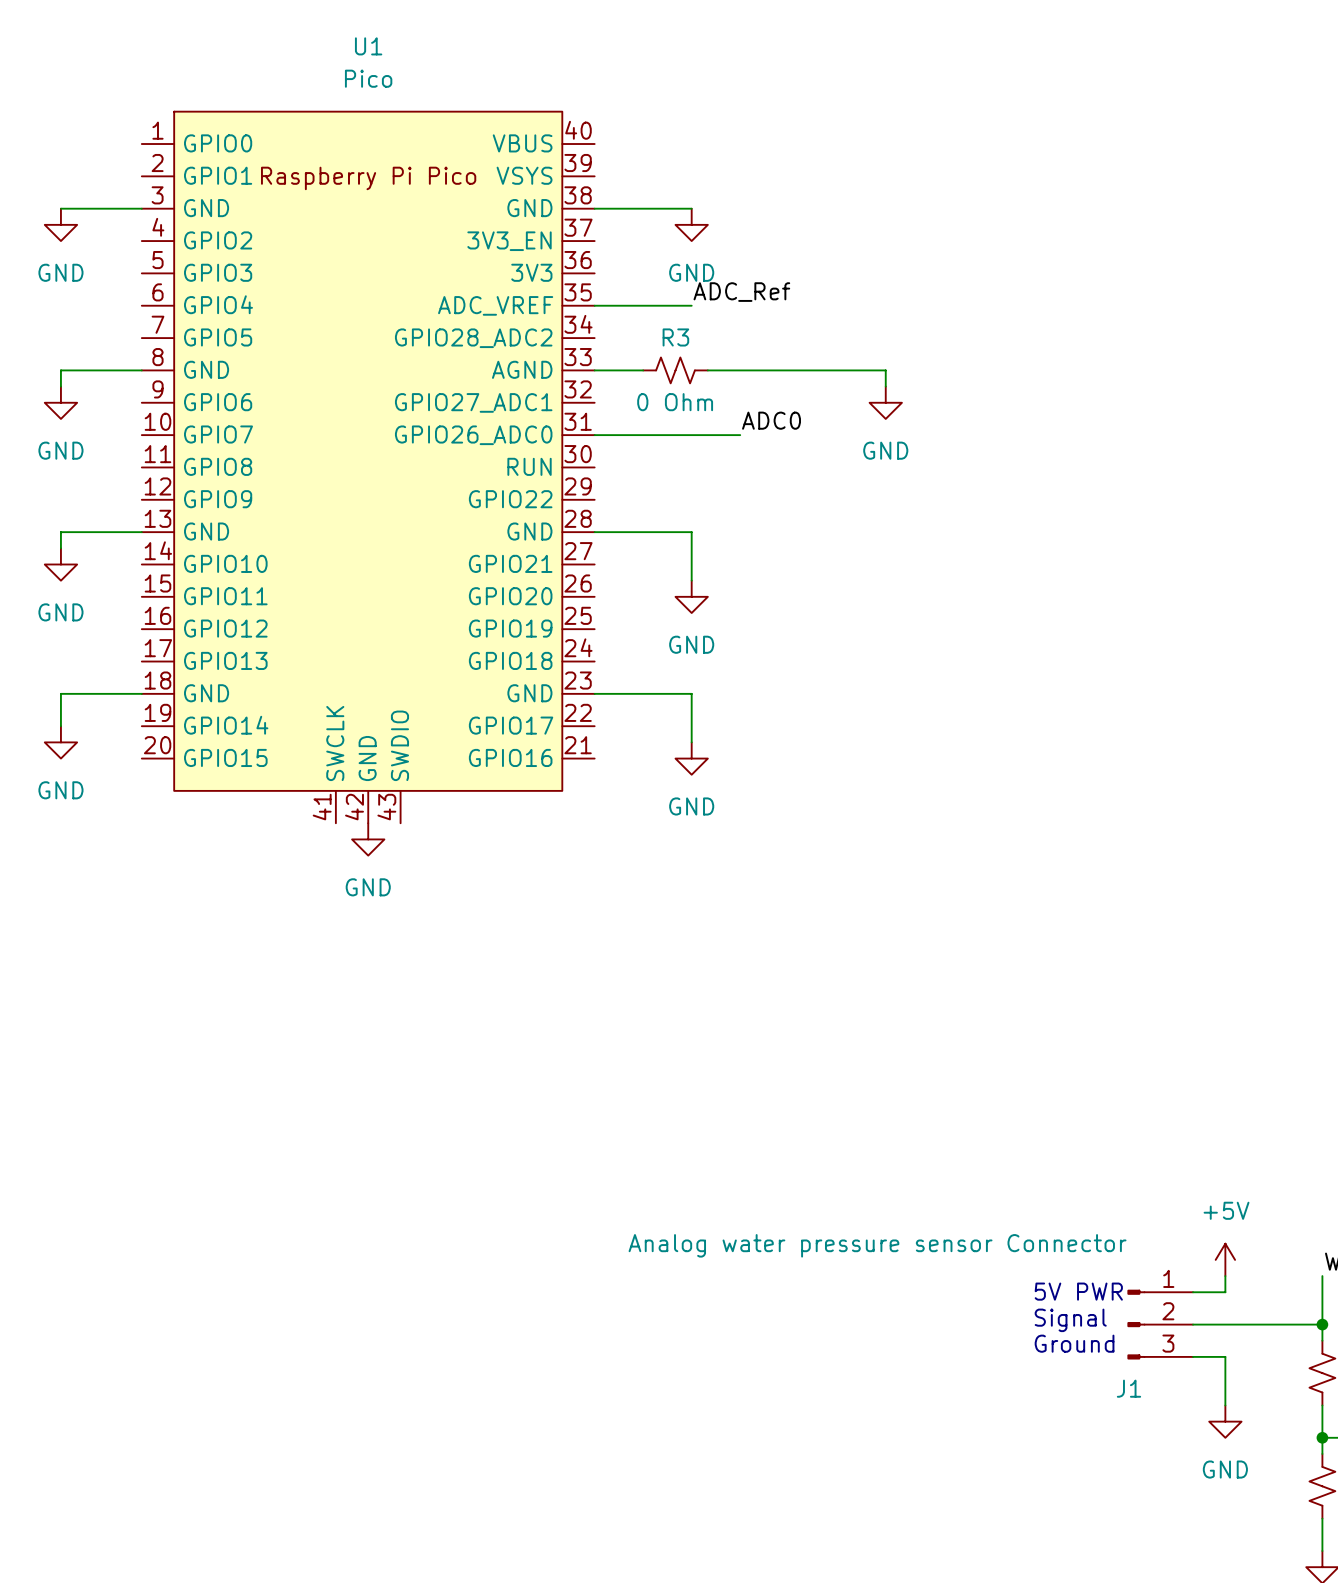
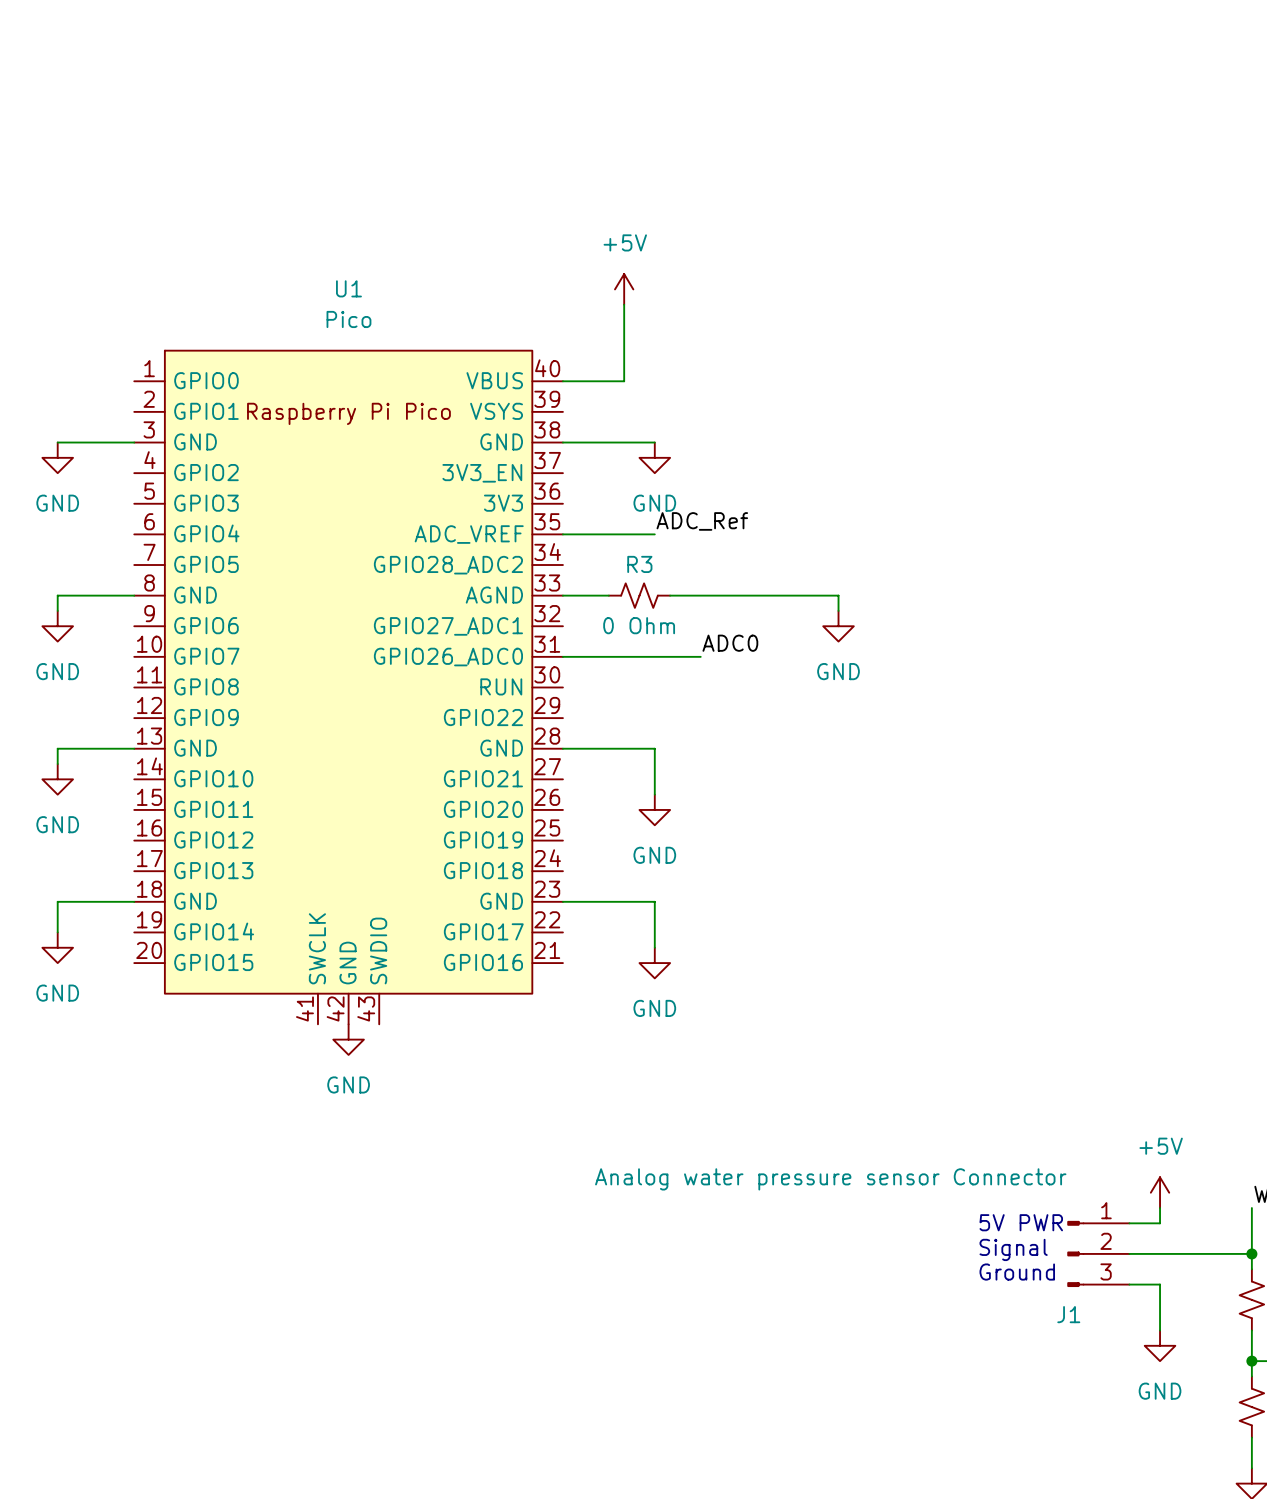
wire: (60, 208) (141, 208) -> (57, 442) (134, 442)
wire: (594, 208) (691, 208) -> (562, 442) (654, 442)
power symbol: GND (60, 224) -> none
power symbol: GND (691, 224) -> none
label position: ADC_Ref (741, 292) -> ADC_Ref (702, 521)
wire: (594, 305) (691, 305) -> (562, 534) (654, 534)
power symbol: none -> +5V (624, 289)
wire: none -> (624, 304) (624, 381) (562, 381)
wire: (141, 370) (60, 370) (60, 386) -> (134, 595) (57, 595) (57, 610)
wire: (594, 370) (643, 370) -> (562, 595) (608, 595)
R3 position: (675, 370) -> (639, 595)
wire: (707, 370) (885, 370) (885, 386) -> (670, 595) (838, 595) (838, 610)
power symbol: GND (60, 402) -> none
power symbol: GND (885, 402) -> none
label position: ADC0 (771, 420) -> ADC0 (730, 643)
wire: (594, 435) (740, 435) -> none
U1 position: (368, 467) -> (348, 687)
power symbol: none -> GND (57, 457)
power symbol: none -> GND (654, 457)
wire: (141, 532) (60, 532) (60, 548) -> (134, 748) (57, 748) (57, 764)
wire: (594, 532) (691, 532) (691, 580) -> (562, 748) (654, 748) (654, 794)
power symbol: GND (60, 564) -> none
power symbol: GND (691, 596) -> none
power symbol: none -> GND (57, 626)
power symbol: none -> GND (838, 626)
wire: (141, 693) (60, 693) (60, 726) -> (134, 901) (57, 901) (57, 932)
wire: (691, 693) (691, 742) -> (654, 656) (700, 656)
power symbol: GND (60, 742) -> none
power symbol position: GND (691, 758) -> GND (654, 809)
power symbol: none -> GND (57, 779)
power symbol: GND (368, 839) -> none
wire: none -> (562, 901) (654, 901) (654, 947)
power symbol: none -> GND (57, 947)
power symbol: none -> GND (654, 963)
power symbol: none -> GND (348, 1039)

